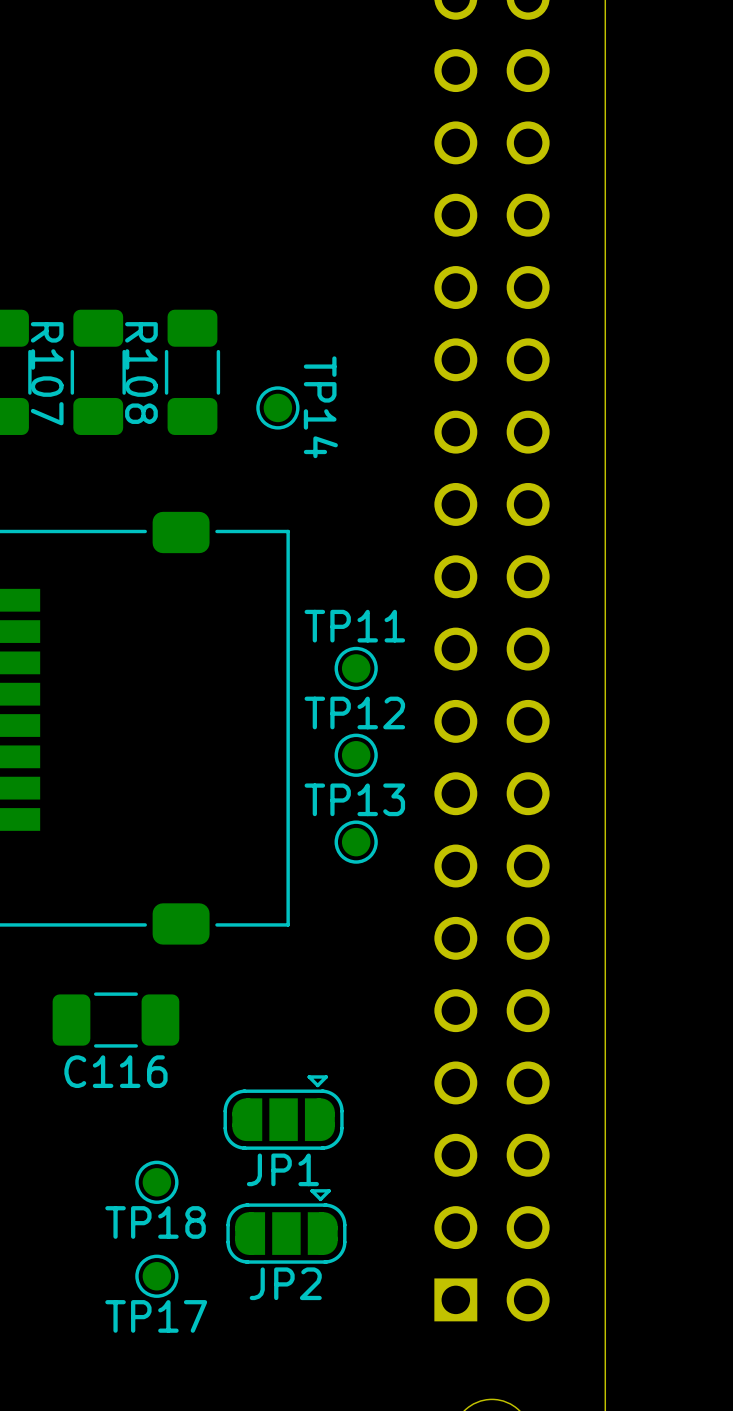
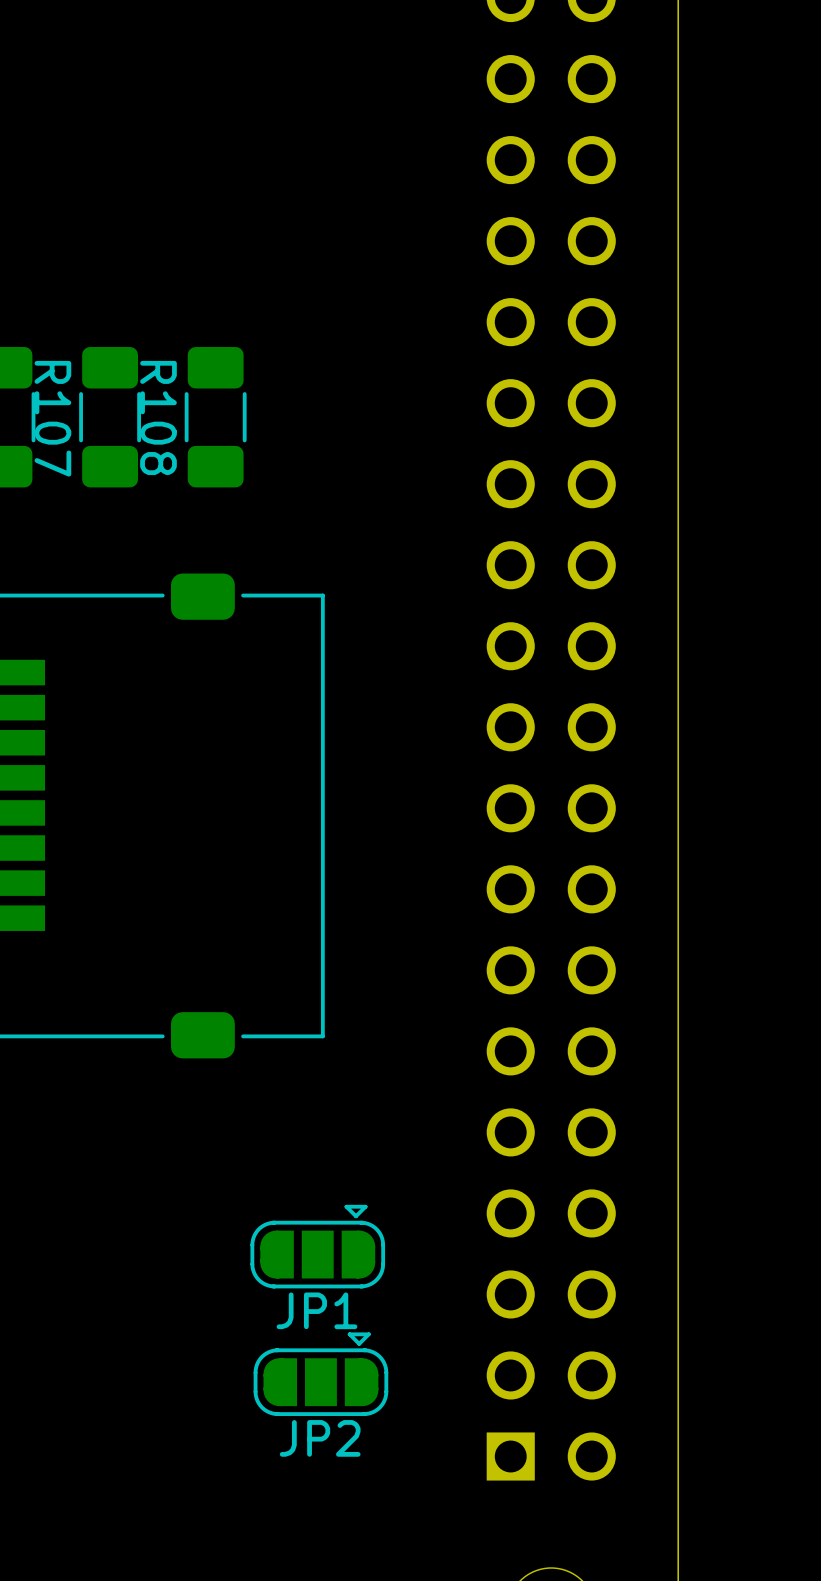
TP14: (277, 407) -> none
TP11: (356, 668) -> none
TP12: (356, 755) -> none
TP13: (356, 842) -> none
C116: (115, 1020) -> none
TP18: (156, 1182) -> none
TP17: (156, 1276) -> none

